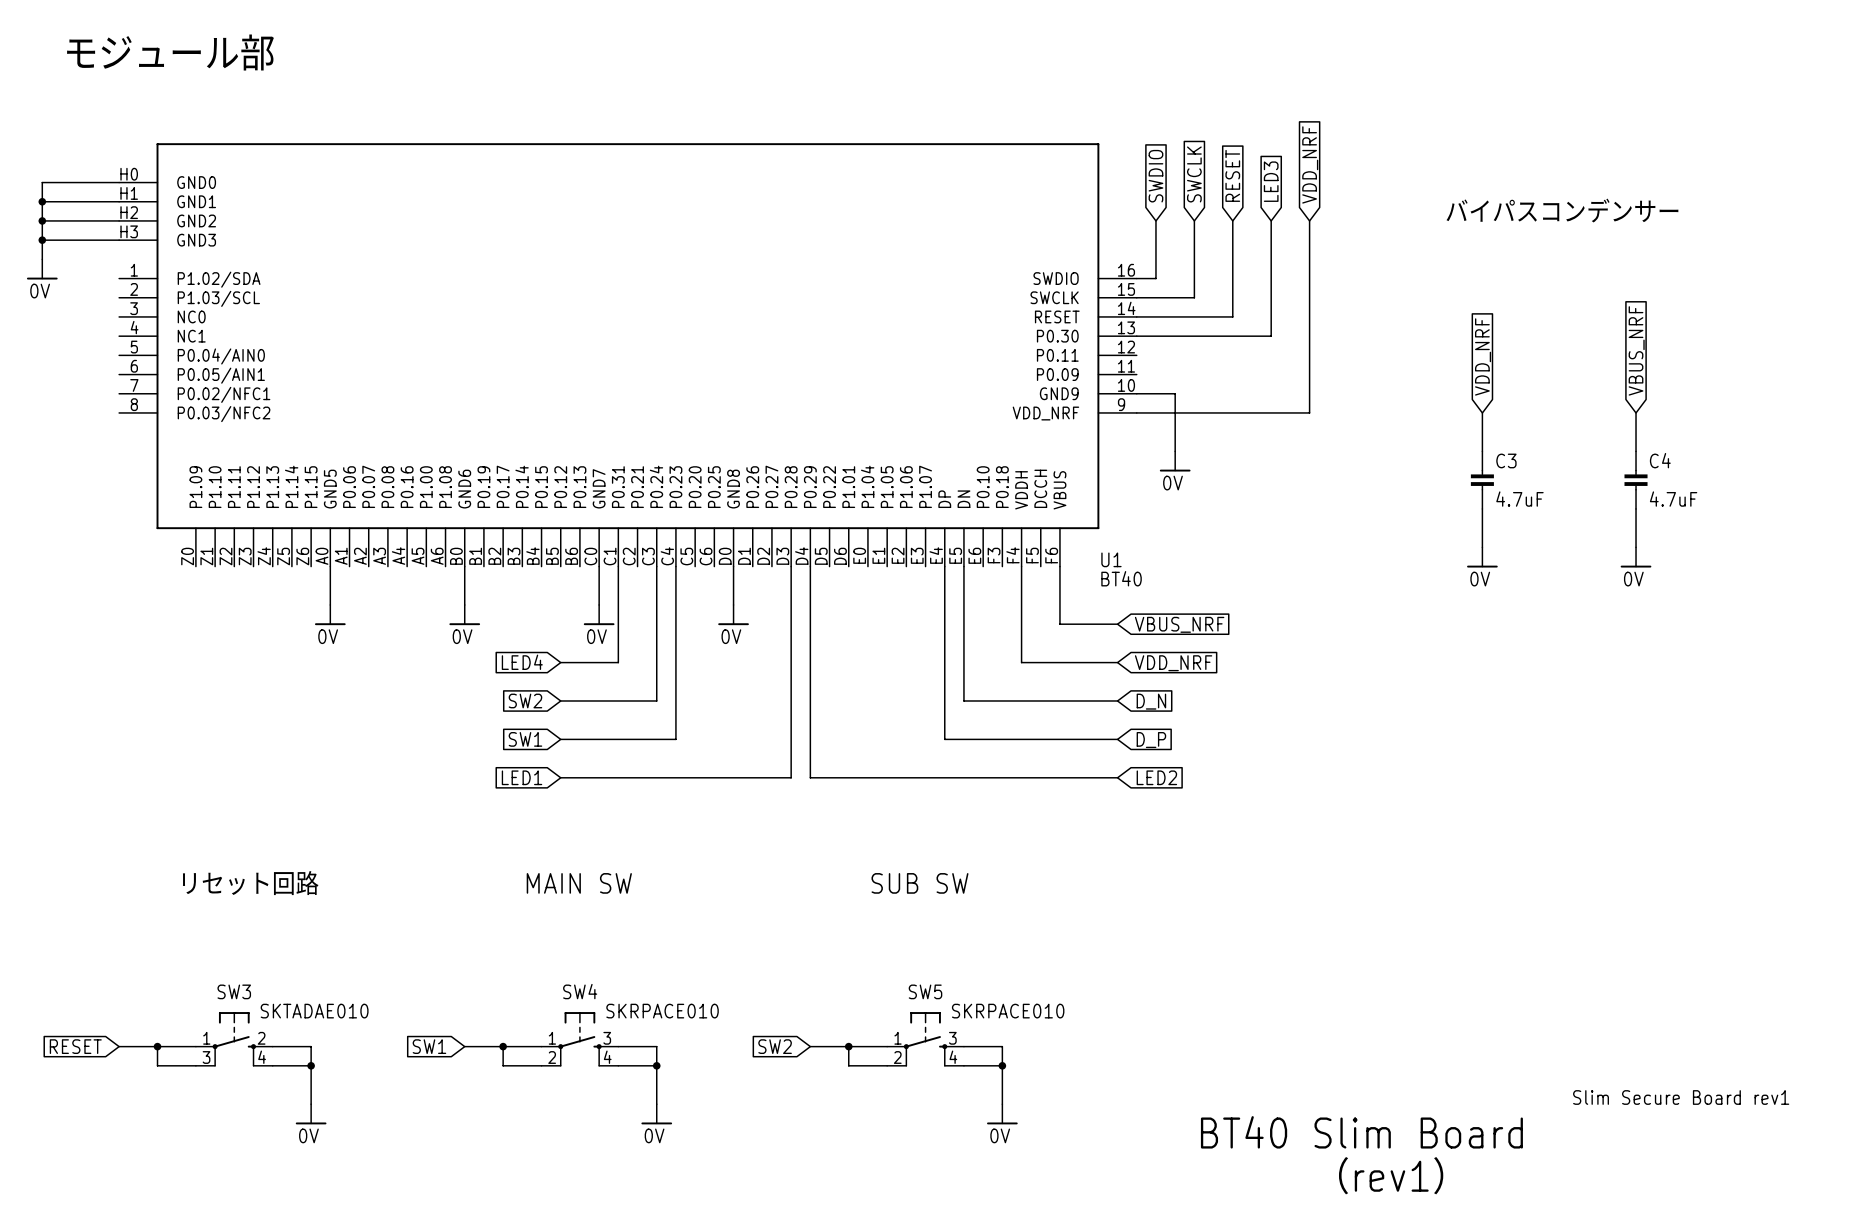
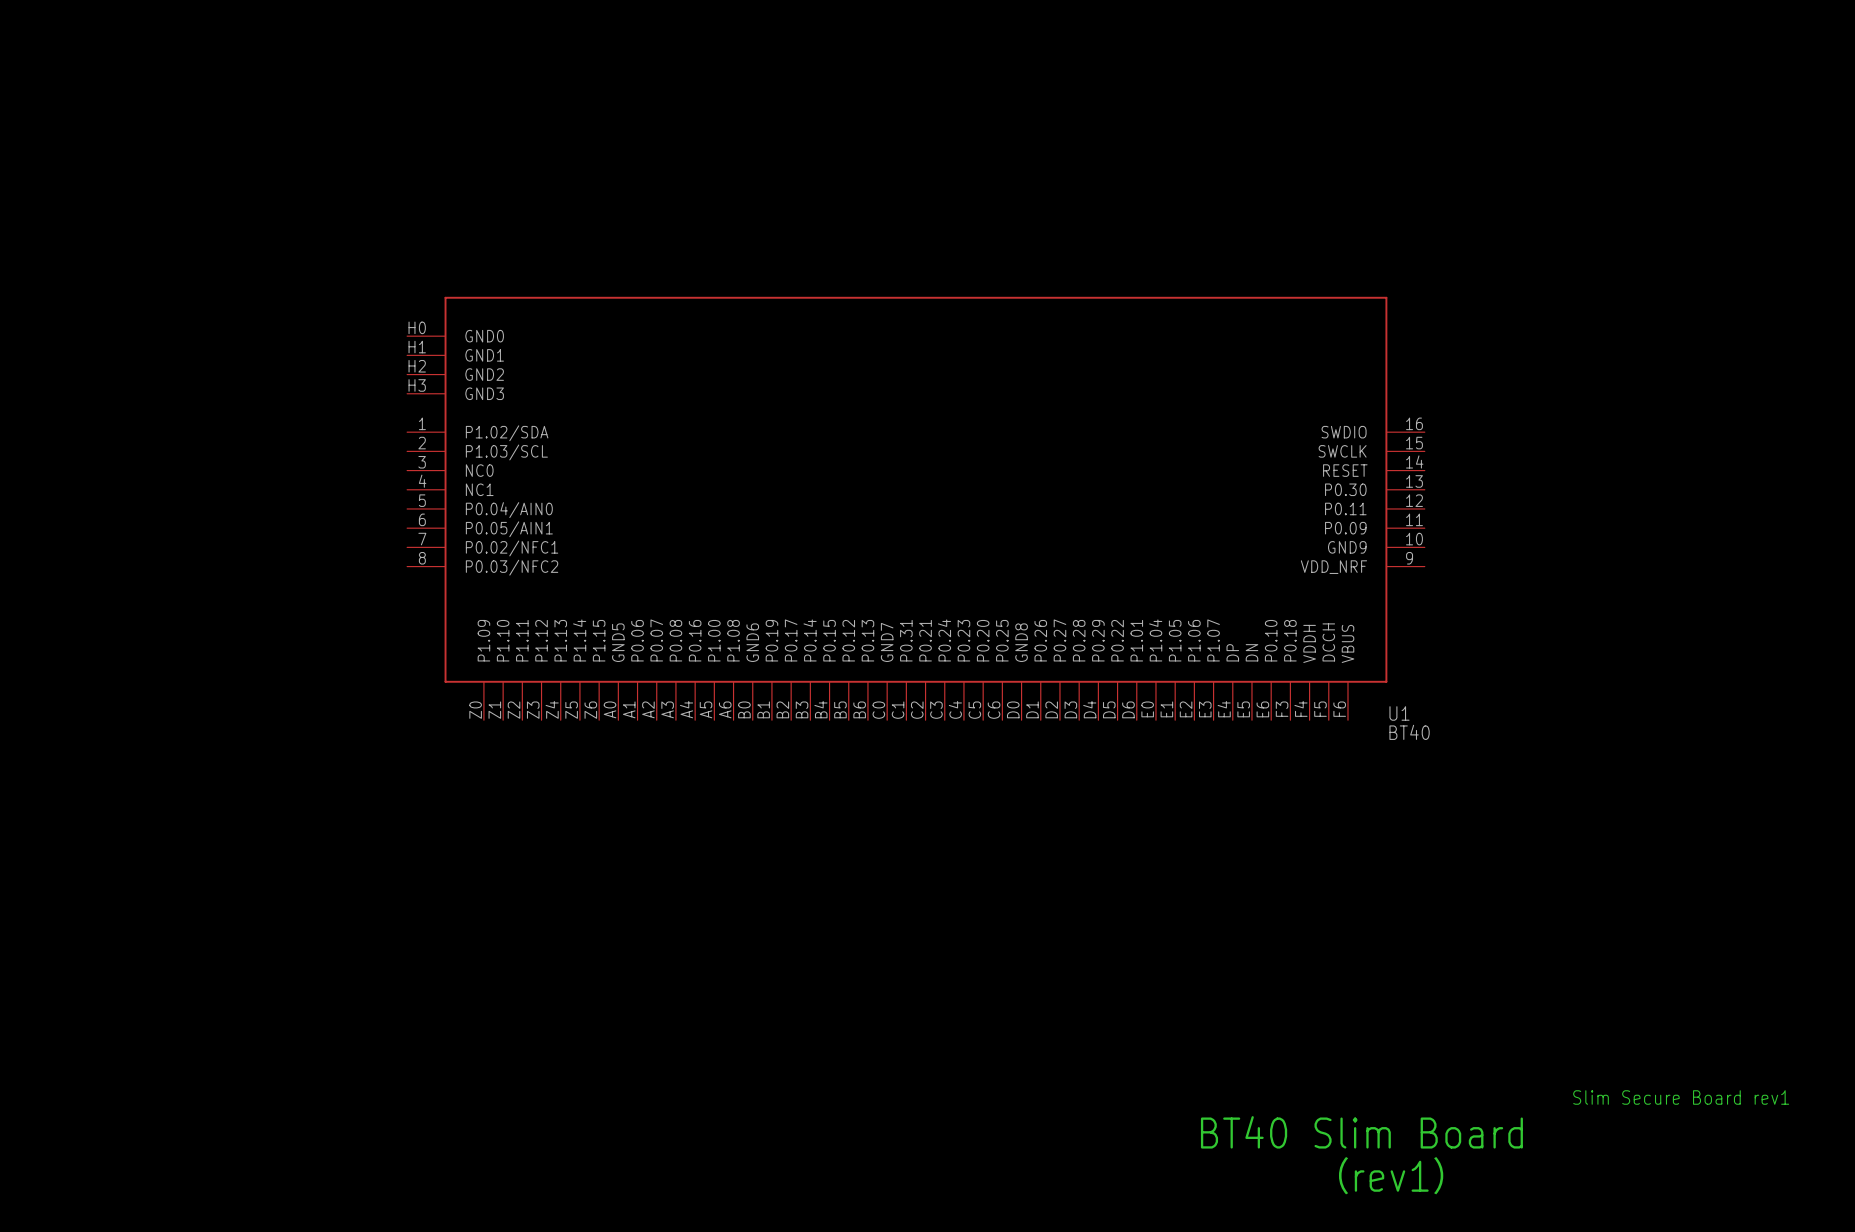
text: モジュール部 (170, 52) -> none
global label: VDD_NRF (1310, 164) -> none
global label: SWCLK (1194, 174) -> none
global label: RESET (1232, 175) -> none
global label: SWDIO (1155, 176) -> none
global label: LED3 (1271, 181) -> none
wire: (119, 182) (42, 182) (42, 259) -> none
wire: (42, 201) (119, 201) -> none
junction: (42, 201) -> none
text: バイパスコンデンサー (1562, 210) -> none
wire: (42, 220) (119, 220) -> none
junction: (42, 220) -> none
wire: (1155, 220) (1155, 278) (1136, 278) -> none
wire: (1194, 220) (1194, 297) (1136, 297) -> none
wire: (1232, 220) (1232, 316) (1136, 316) -> none
wire: (1271, 220) (1271, 336) (1136, 336) -> none
wire: (1309, 220) (1309, 412) (1136, 412) -> none
wire: (42, 240) (119, 240) -> none
junction: (42, 240) -> none
power symbol: 0V (42, 269) -> none
global label: VBUS_NRF (1636, 350) -> none
U1 position: (627, 354) -> (915, 508)
global label: VDD_NRF (1483, 356) -> none
wire: (1136, 393) (1175, 393) (1175, 451) -> none
wire: (1482, 412) (1482, 451) -> none
wire: (1636, 412) (1636, 451) -> none
power symbol: 0V (1175, 461) -> none
C3: 4.7uF (1482, 480) -> none
C4: 4.7uF (1636, 480) -> none
wire: (1482, 508) (1482, 547) -> none
wire: (1636, 508) (1636, 547) -> none
power symbol: 0V (1482, 557) -> none
power symbol: 0V (1636, 557) -> none
wire: (330, 566) (330, 604) -> none
wire: (464, 566) (464, 604) -> none
wire: (599, 566) (599, 604) -> none
wire: (618, 566) (618, 662) (560, 662) -> none
wire: (656, 566) (656, 700) (560, 700) -> none
wire: (675, 566) (675, 739) (560, 739) -> none
wire: (733, 566) (733, 604) -> none
wire: (791, 566) (791, 777) (560, 777) -> none
wire: (810, 566) (810, 777) (1117, 777) -> none
wire: (944, 566) (944, 739) (1117, 739) -> none
wire: (963, 566) (963, 700) (1117, 700) -> none
wire: (1021, 566) (1021, 662) (1117, 662) -> none
wire: (1059, 566) (1059, 624) (1117, 624) -> none
power symbol: 0V (330, 615) -> none
power symbol: 0V (464, 615) -> none
power symbol: 0V (599, 615) -> none
power symbol: 0V (733, 615) -> none
global label: VBUS_NRF (1179, 624) -> none
global label: LED4 (522, 662) -> none
global label: VDD_NRF (1173, 663) -> none
global label: SW2 (525, 700) -> none
global label: D_N (1151, 701) -> none
global label: SW1 (525, 739) -> none
global label: D_P (1151, 740) -> none
global label: LED1 (522, 777) -> none
global label: LED2 (1156, 777) -> none
text: リセット回路 (250, 883) -> none
text: MAIN SW (579, 883) -> none
text: SUB SW (919, 883) -> none
SW3: SKTADAE010 (234, 1039) -> none
SW4: SKRPACE010 (579, 1039) -> none
SW5: SKRPACE010 (925, 1039) -> none
global label: RESET (75, 1046) -> none
wire: (119, 1046) (195, 1046) -> none
wire: (157, 1046) (157, 1065) (195, 1065) -> none
junction: (157, 1046) -> none
wire: (272, 1046) (311, 1046) (311, 1104) -> none
global label: SW1 (429, 1046) -> none
wire: (464, 1046) (541, 1046) -> none
wire: (503, 1046) (503, 1065) (541, 1065) -> none
junction: (503, 1046) -> none
wire: (618, 1046) (656, 1046) (656, 1104) -> none
global label: SW2 (775, 1046) -> none
wire: (810, 1046) (887, 1046) -> none
wire: (848, 1046) (848, 1065) (887, 1065) -> none
junction: (848, 1046) -> none
wire: (963, 1046) (1002, 1046) (1002, 1104) -> none
wire: (272, 1065) (311, 1065) -> none
junction: (311, 1065) -> none
wire: (618, 1065) (656, 1065) -> none
junction: (656, 1065) -> none
wire: (963, 1065) (1002, 1065) -> none
junction: (1002, 1065) -> none
power symbol: 0V (311, 1114) -> none
power symbol: 0V (656, 1114) -> none
power symbol: 0V (1002, 1114) -> none

